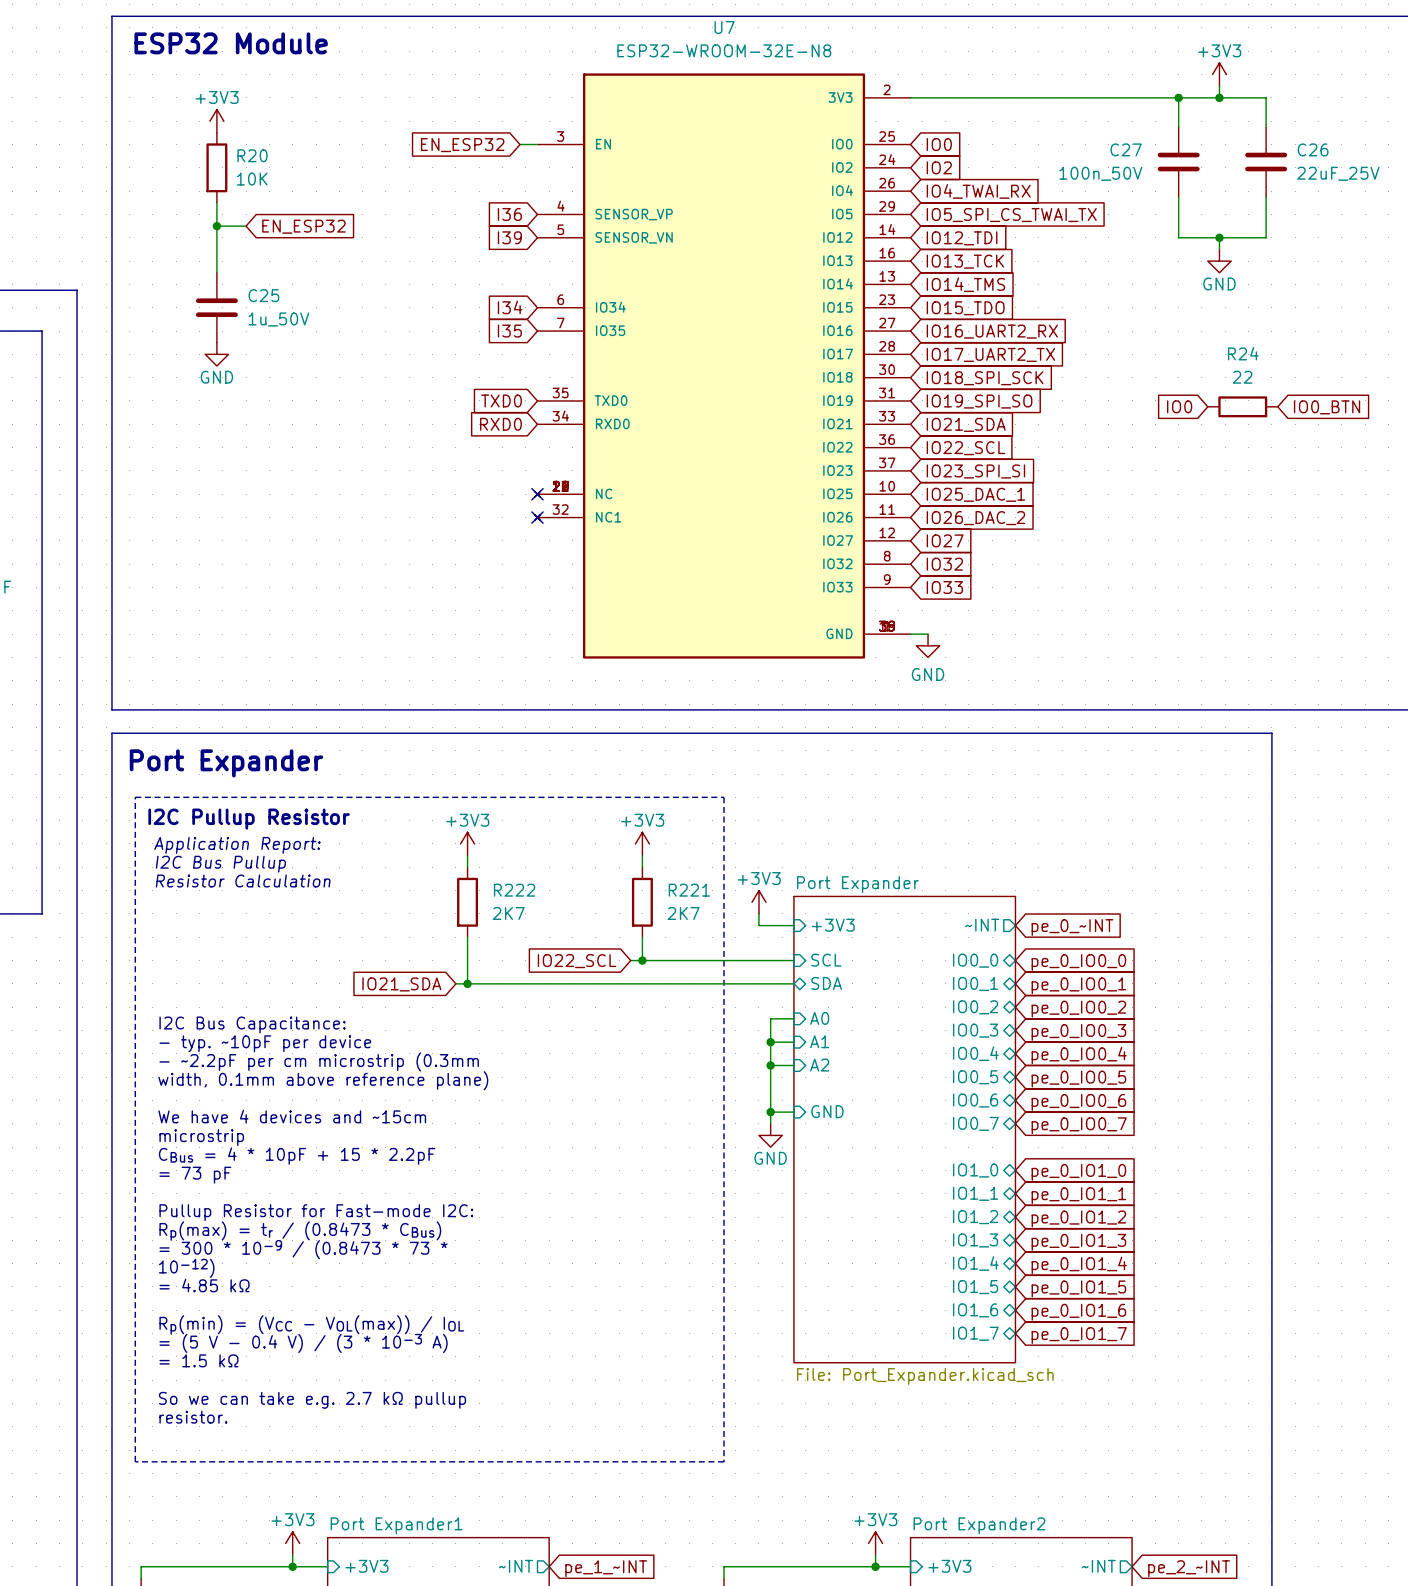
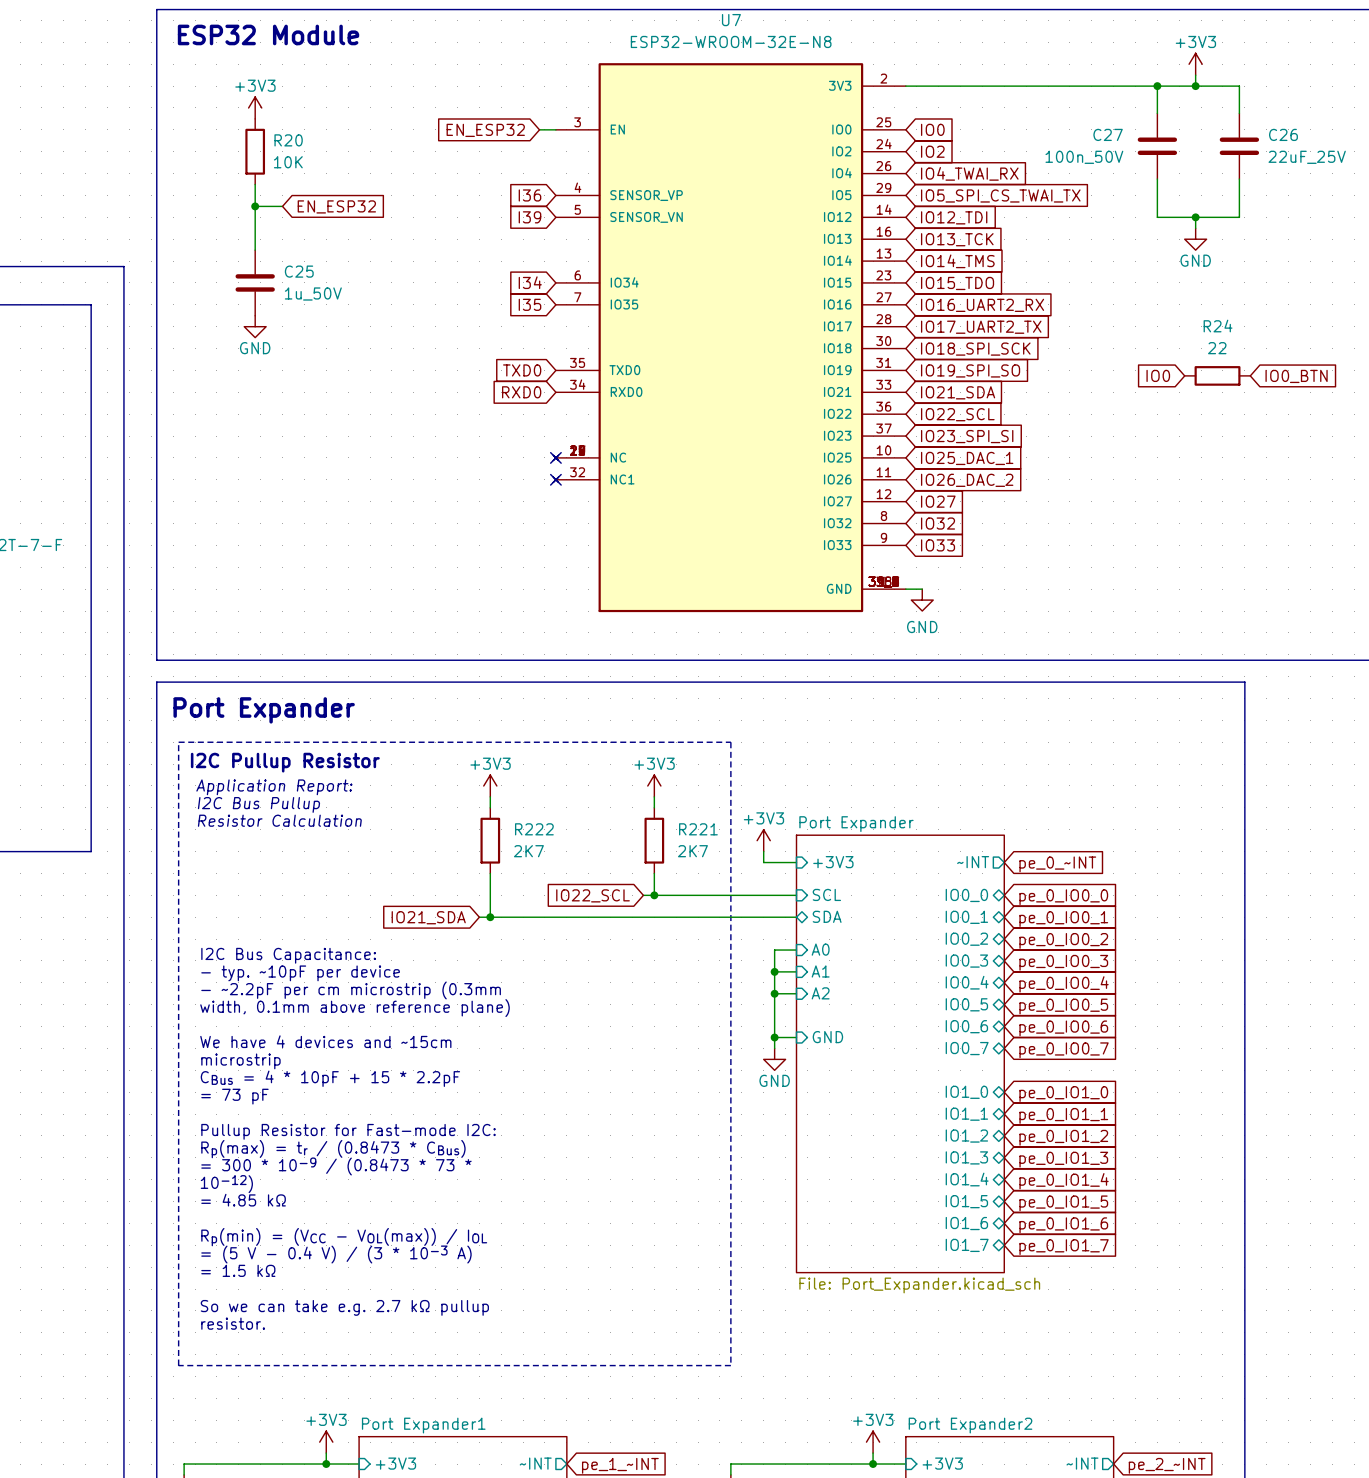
U7 symbol: [534, 73, 911, 659] -> [553, 63, 906, 613]

